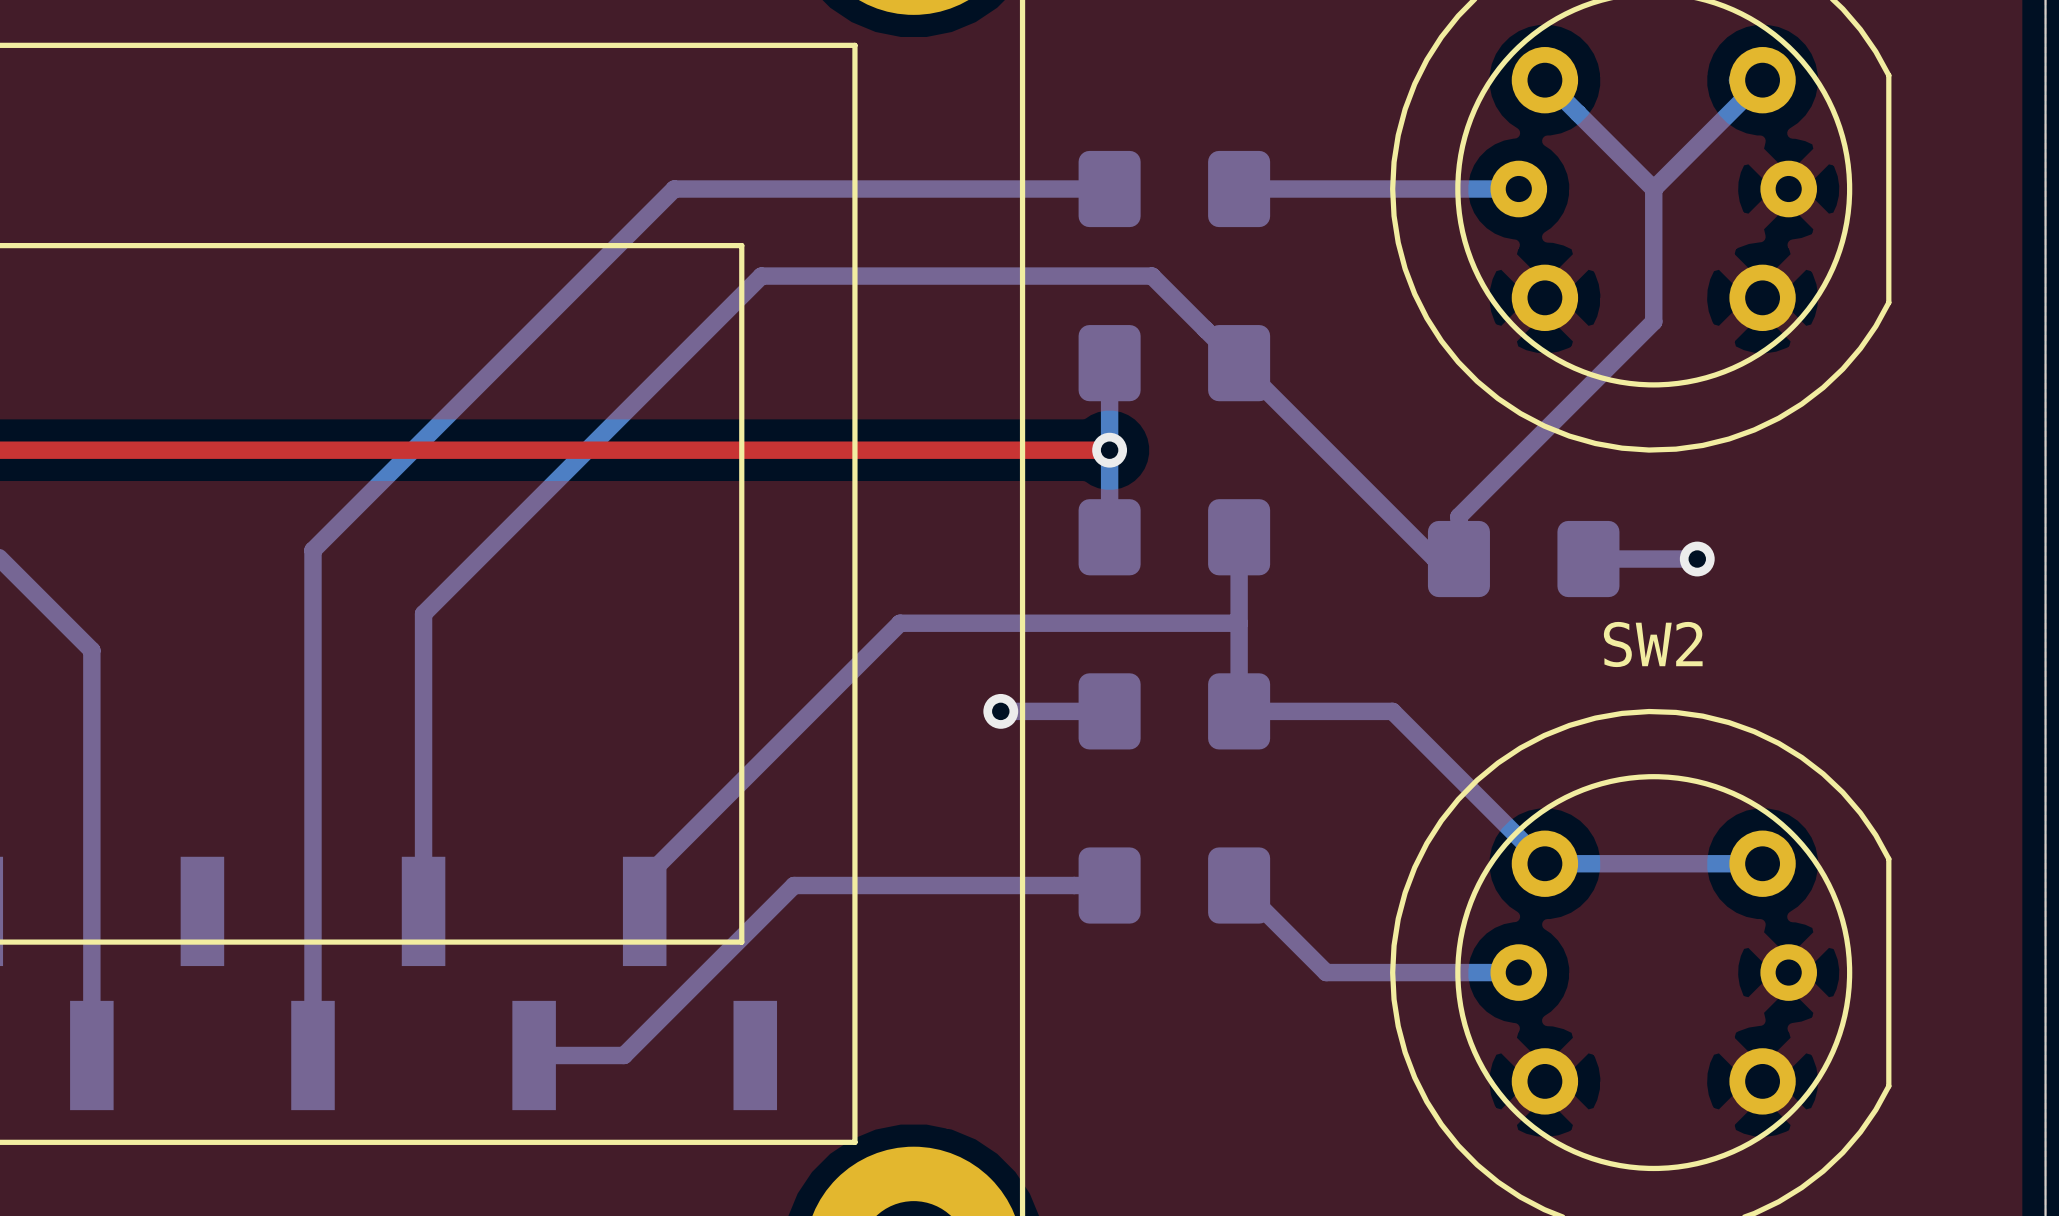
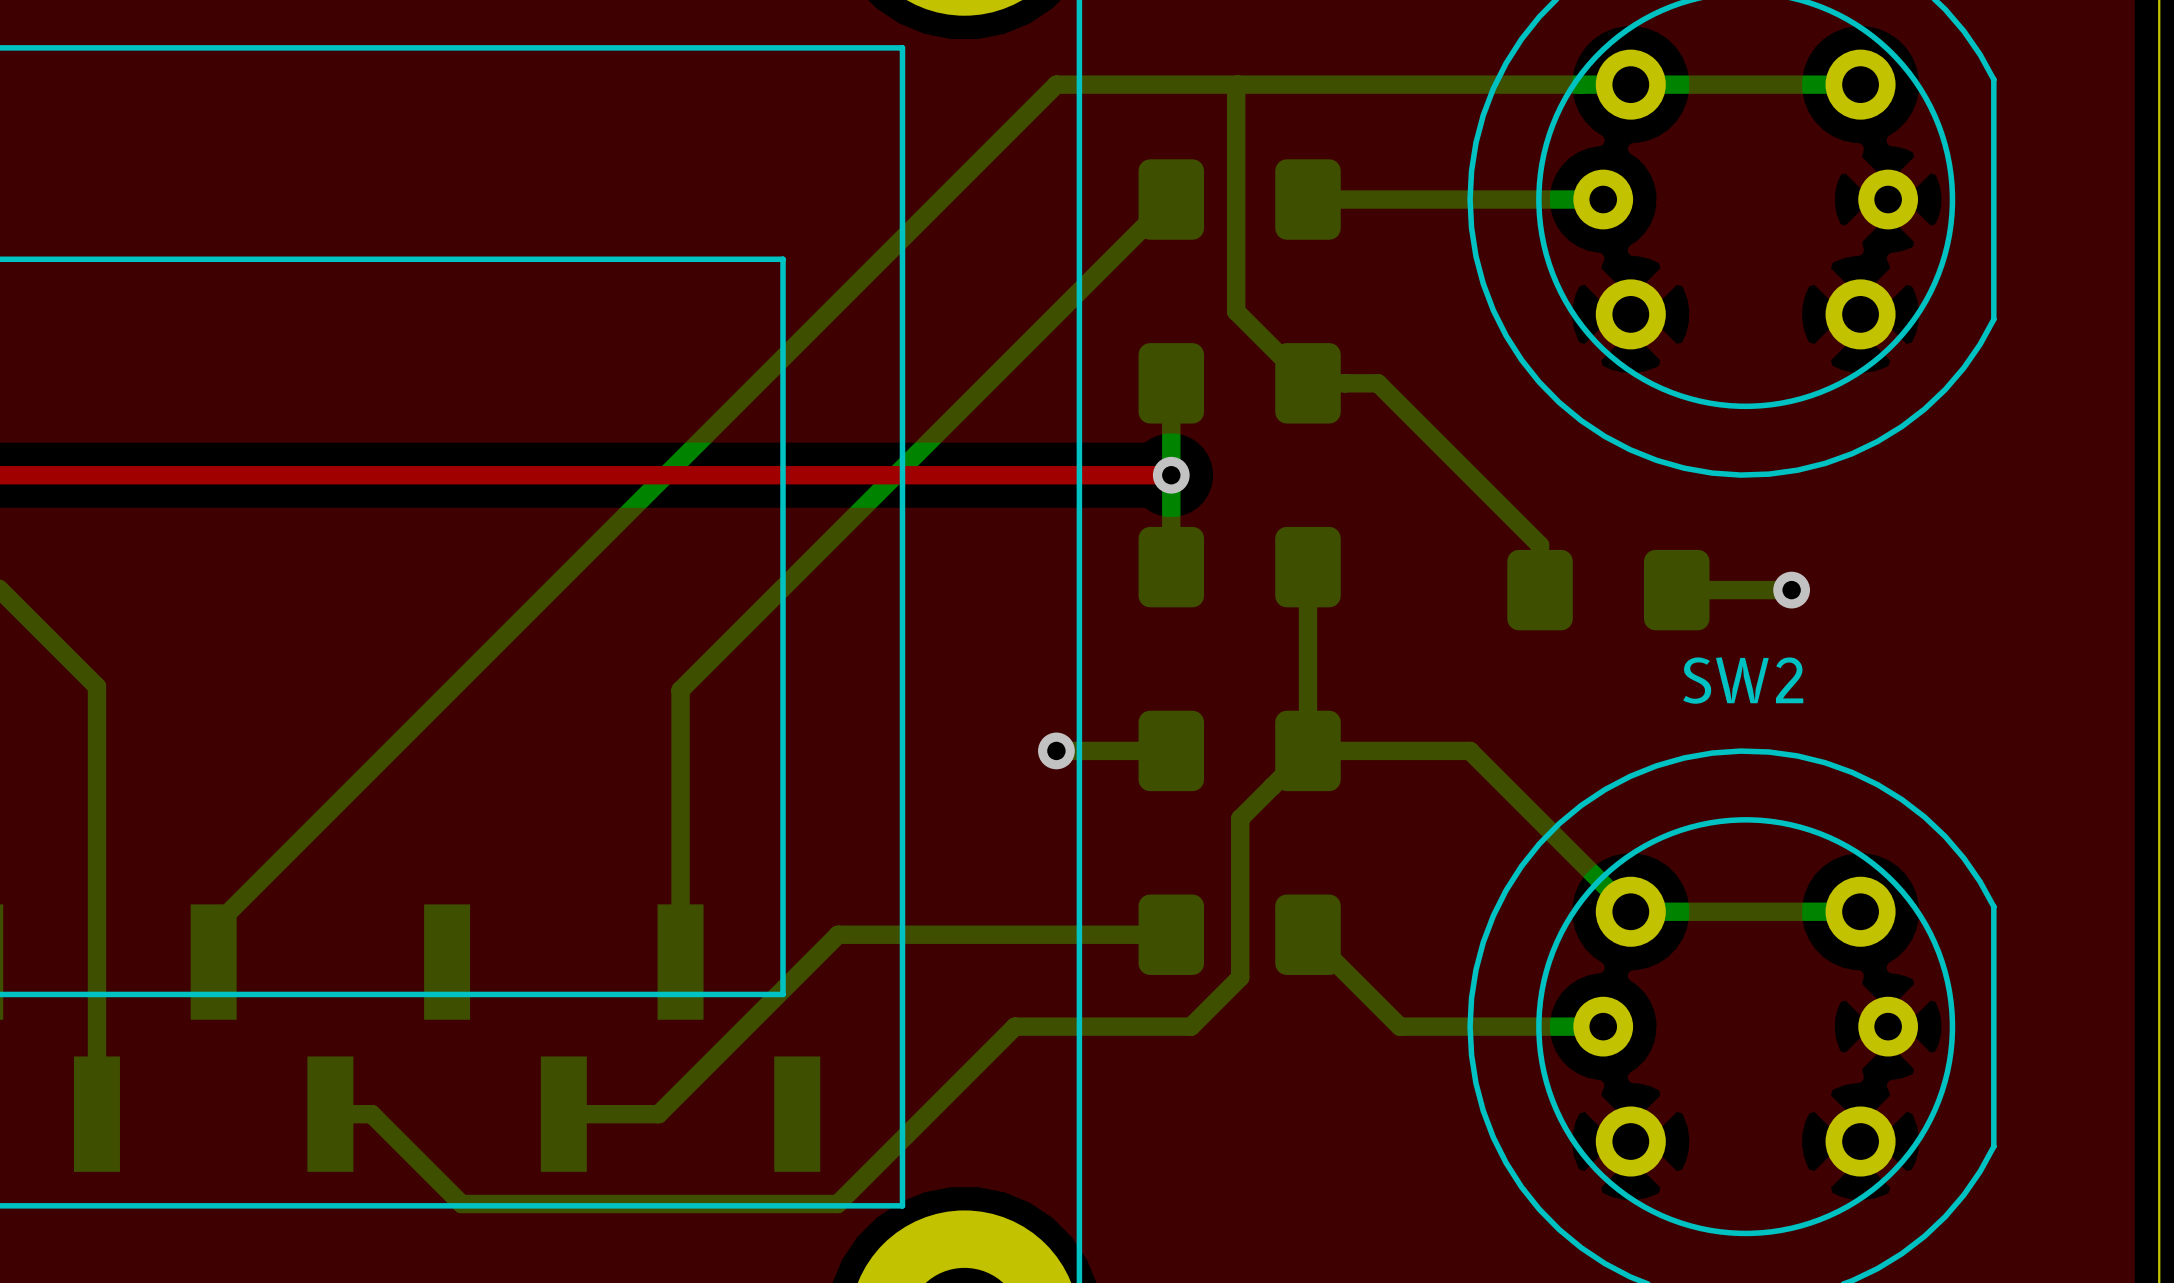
bottom track: (1544, 80) (1653, 189) -> none
bottom track: none -> (1834, 84) (1056, 84) (213, 927) (213, 962)
bottom track: (1784, 80) (1762, 80) (1653, 189) -> none
bottom track: (1109, 189) (674, 189) (312, 550) (312, 1055) -> (1171, 199) (680, 690) (680, 927)
bottom track: (1653, 189) (1653, 321) (1458, 516) -> none
bottom track: (1171, 295) (1152, 276) (761, 276) (423, 613) (423, 911) -> (1236, 311) (1236, 86) (1237, 84)
bottom track: (1239, 363) (1435, 559) (1458, 559) -> (1307, 383) (1378, 383) (1540, 545)
bottom track: (1239, 623) (900, 623) (644, 878) -> none
bottom track: none -> (1307, 750) (1240, 818) (1240, 977) (1191, 1026) (1015, 1026) (837, 1204) (461, 1204) (371, 1114) (330, 1114)

